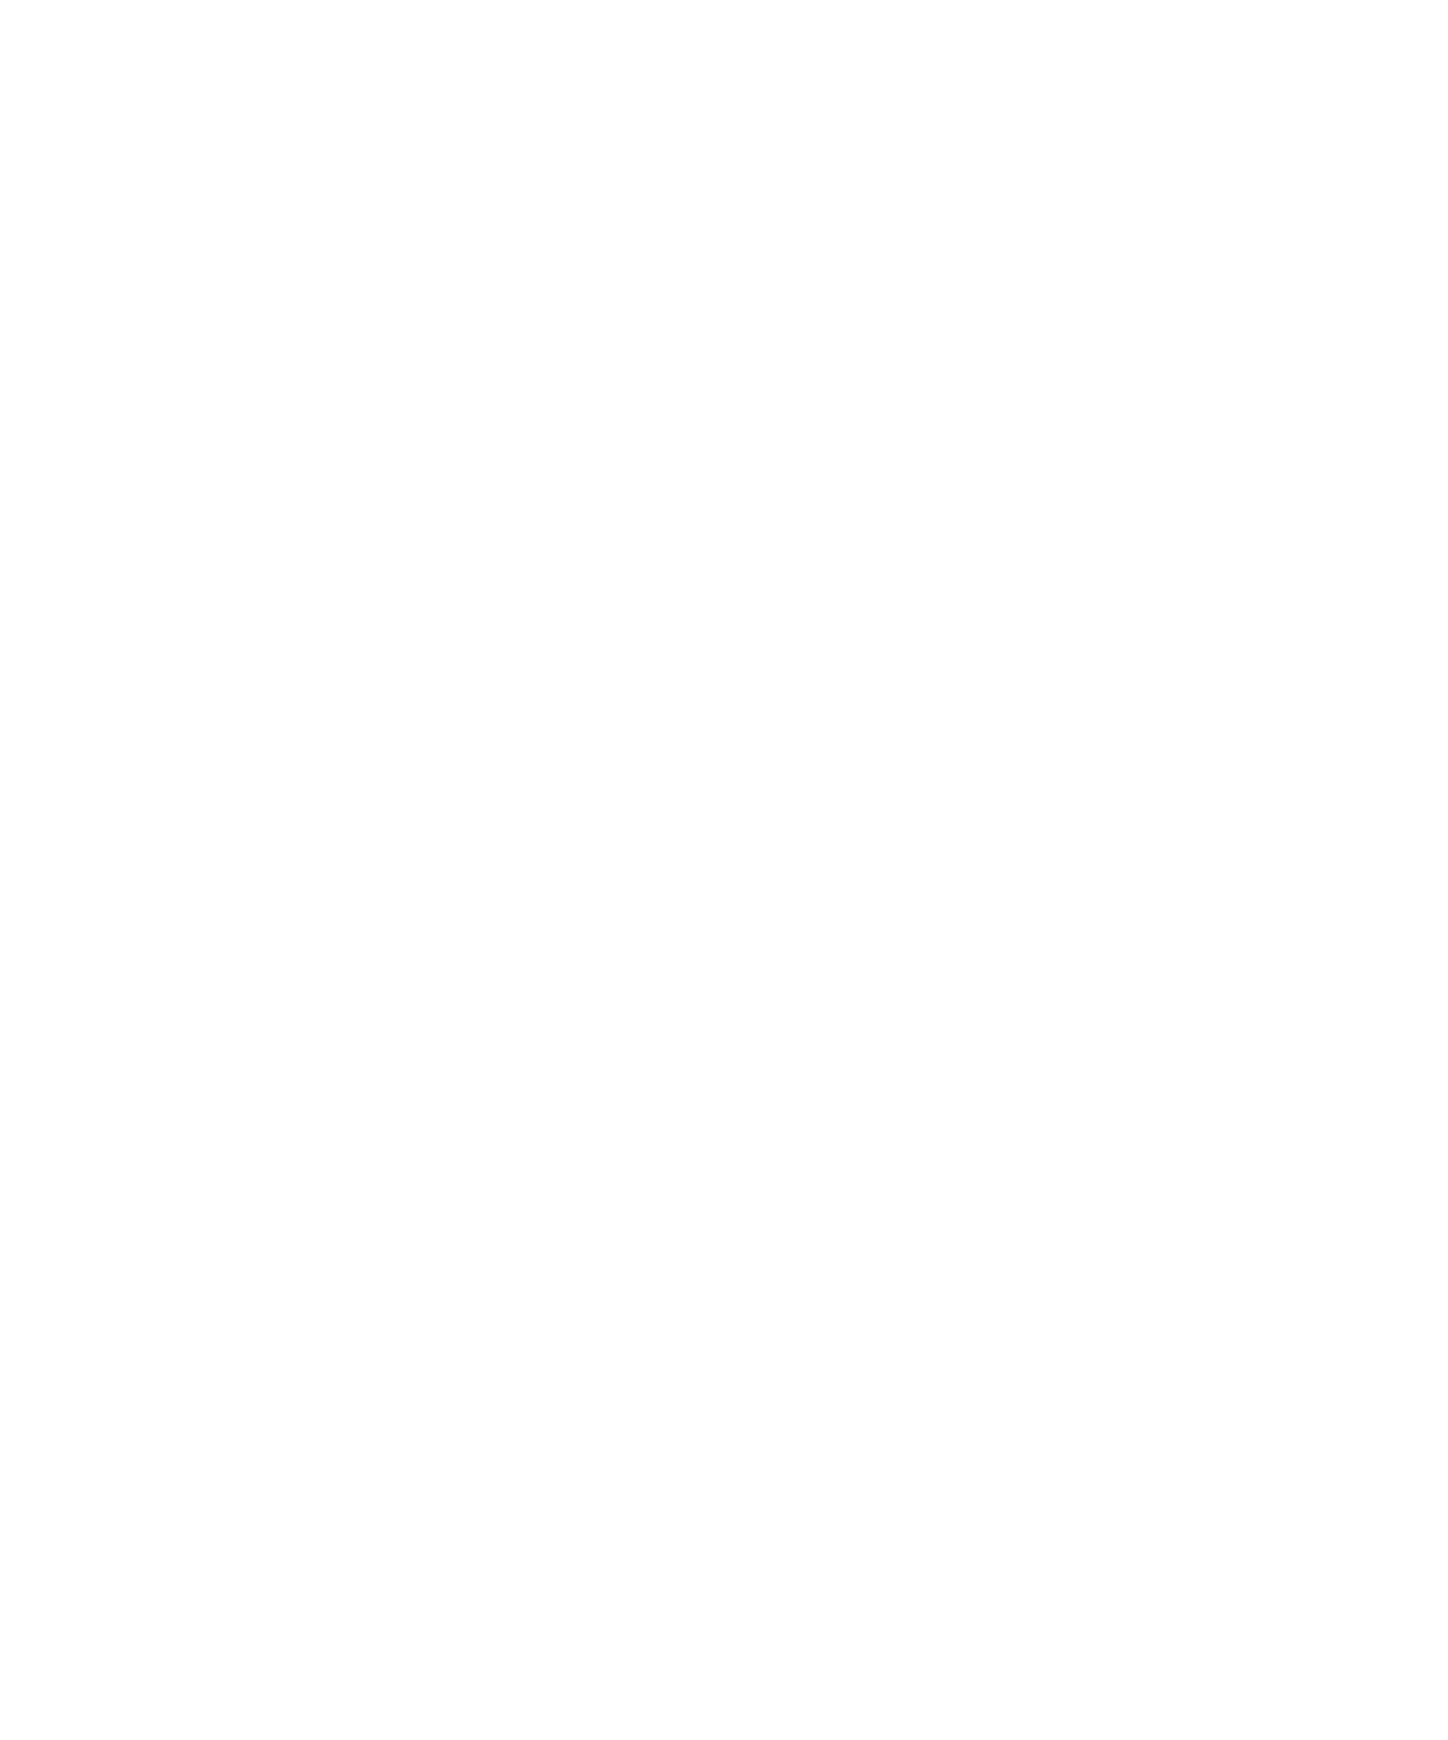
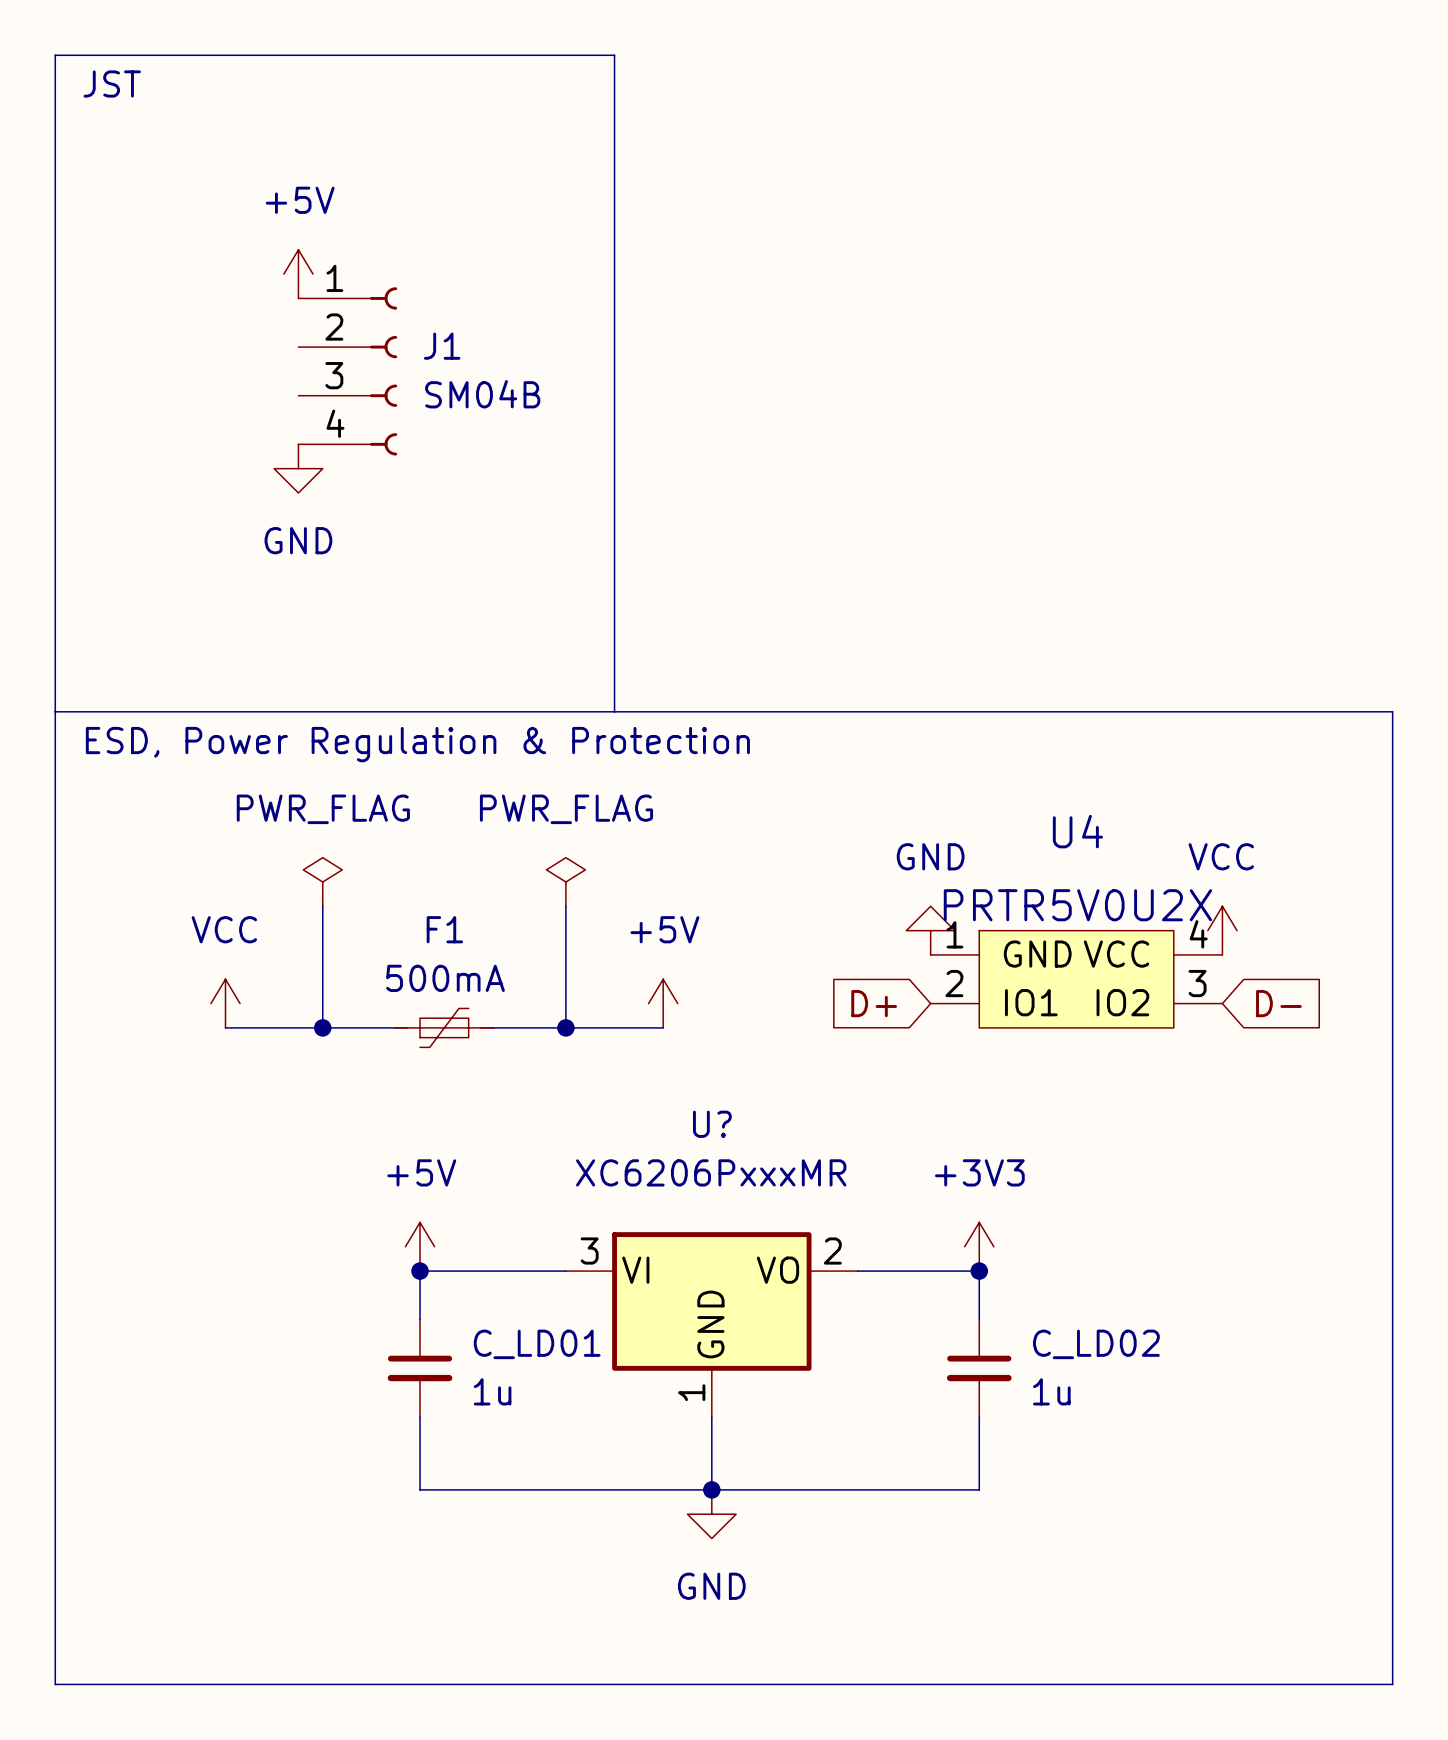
text: none -> JST (112, 84)
power symbol: none -> +5V (298, 274)
J1: none -> SM04B (347, 371)
power symbol: none -> GND (298, 468)
line: none -> (55, 711) (1392, 711) (1392, 1684) (55, 1684) (55, 55) (614, 55) (614, 711)
text: none -> ESD, Power Regulation & Protection (417, 744)
power symbol: none -> PWR_FLAG (322, 882)
power symbol: none -> PWR_FLAG (565, 882)
wire: none -> (322, 906) (322, 1027)
wire: none -> (565, 906) (565, 1027)
power symbol: none -> GND (930, 930)
power symbol: none -> VCC (1222, 930)
U4: none -> PRTR5V0U2X (1076, 979)
power symbol: none -> VCC (225, 1003)
power symbol: none -> +5V (663, 1003)
global label: none -> D+ (874, 1003)
global label: none -> D- (1278, 1003)
wire: none -> (225, 1027) (395, 1027)
junction: none -> (322, 1027)
F1: none -> 500mA (444, 1027)
wire: none -> (492, 1027) (663, 1027)
junction: none -> (565, 1027)
power symbol: none -> +5V (420, 1246)
power symbol: none -> +3V3 (979, 1246)
junction: none -> (420, 1271)
wire: none -> (565, 1271) (420, 1271) (420, 1319)
wire: none -> (857, 1271) (979, 1271) (979, 1319)
junction: none -> (979, 1271)
U?: none -> XC6206PxxxMR (711, 1324)
C_LD01: none -> 1u (420, 1368)
C_LD02: none -> 1u (979, 1368)
wire: none -> (420, 1416) (420, 1489) (979, 1489) (979, 1416)
wire: none -> (711, 1416) (711, 1489)
junction: none -> (711, 1489)
power symbol: none -> GND (711, 1514)

